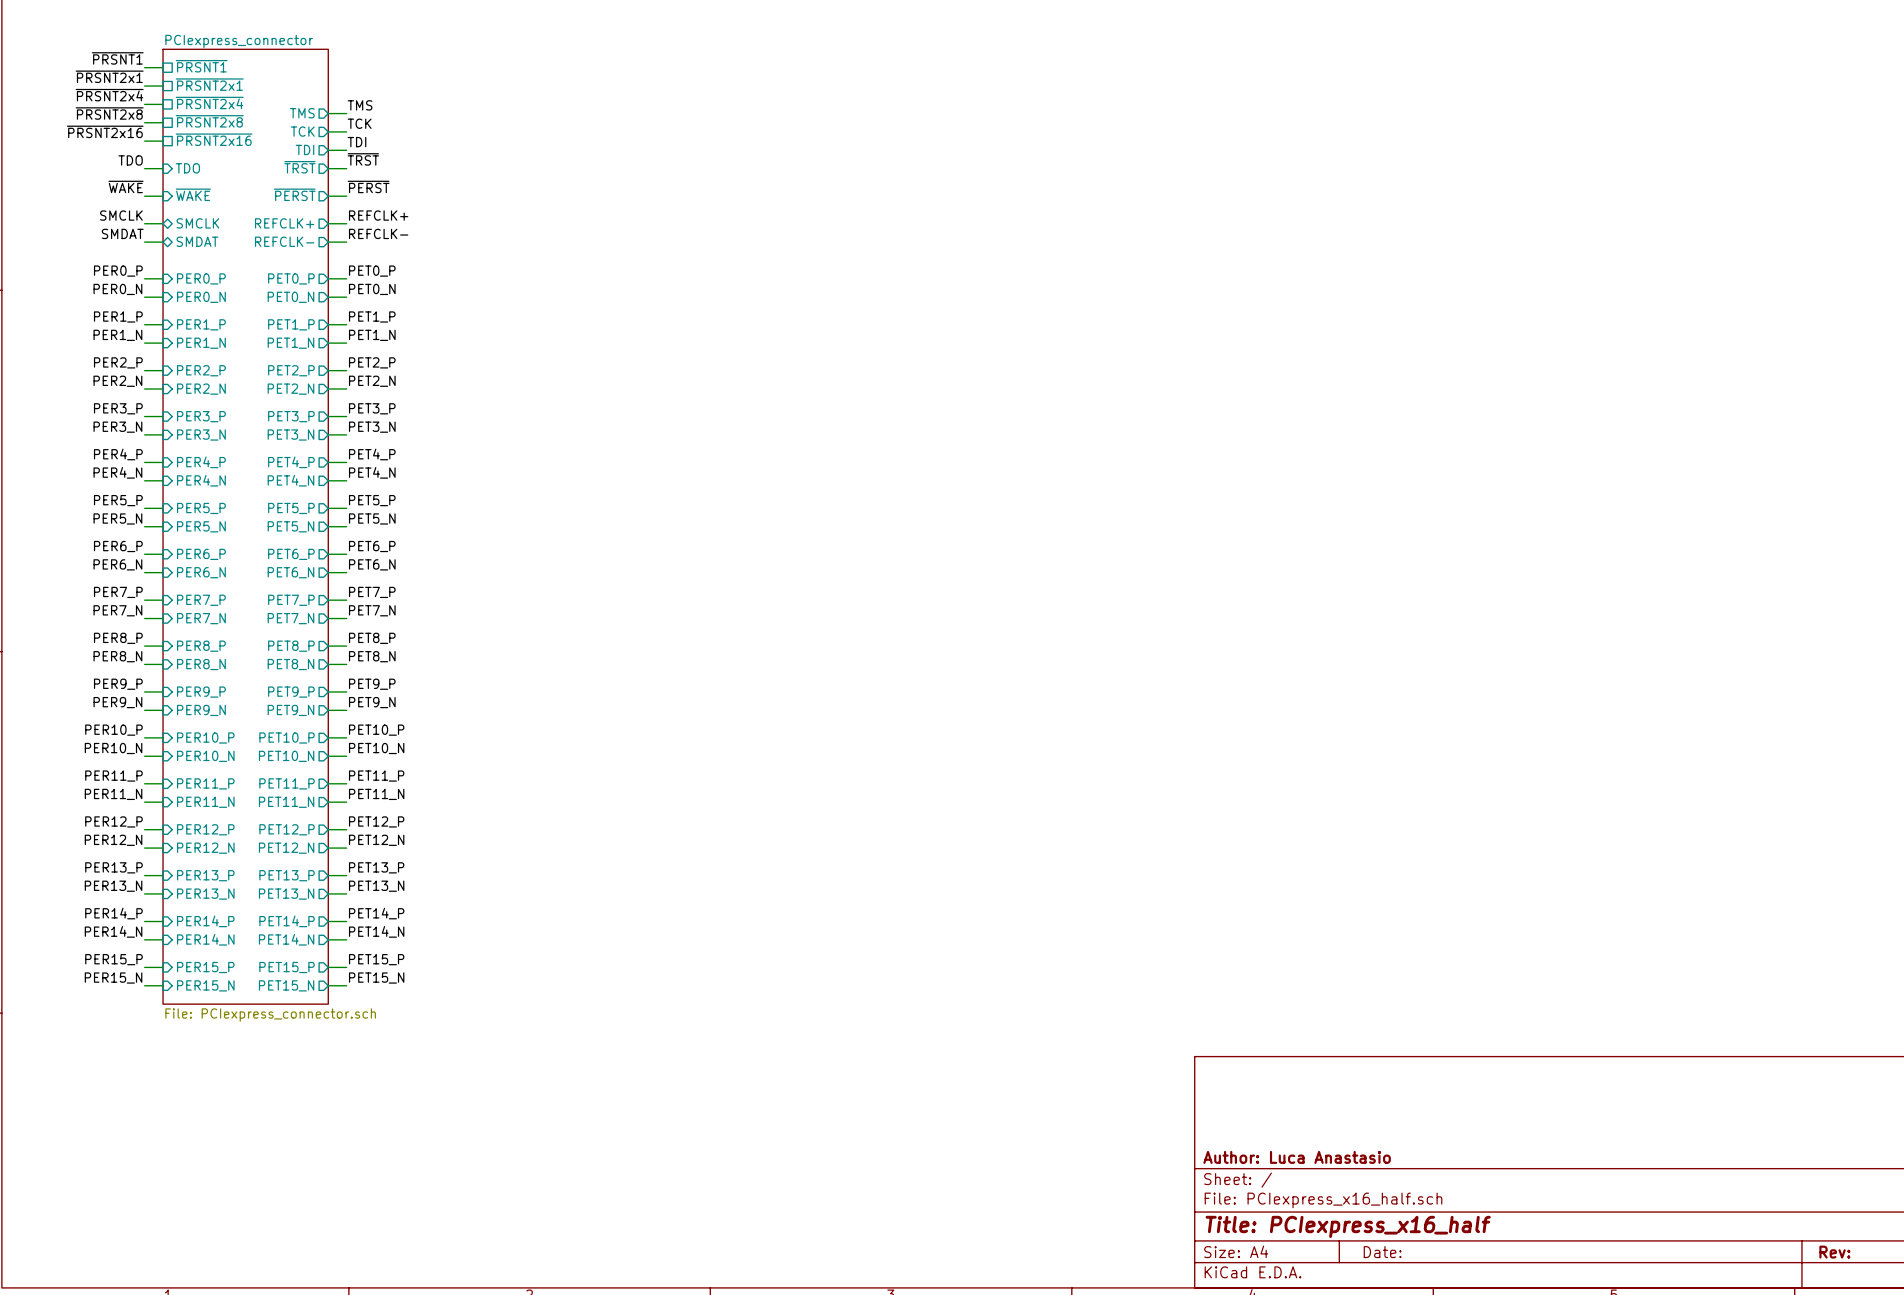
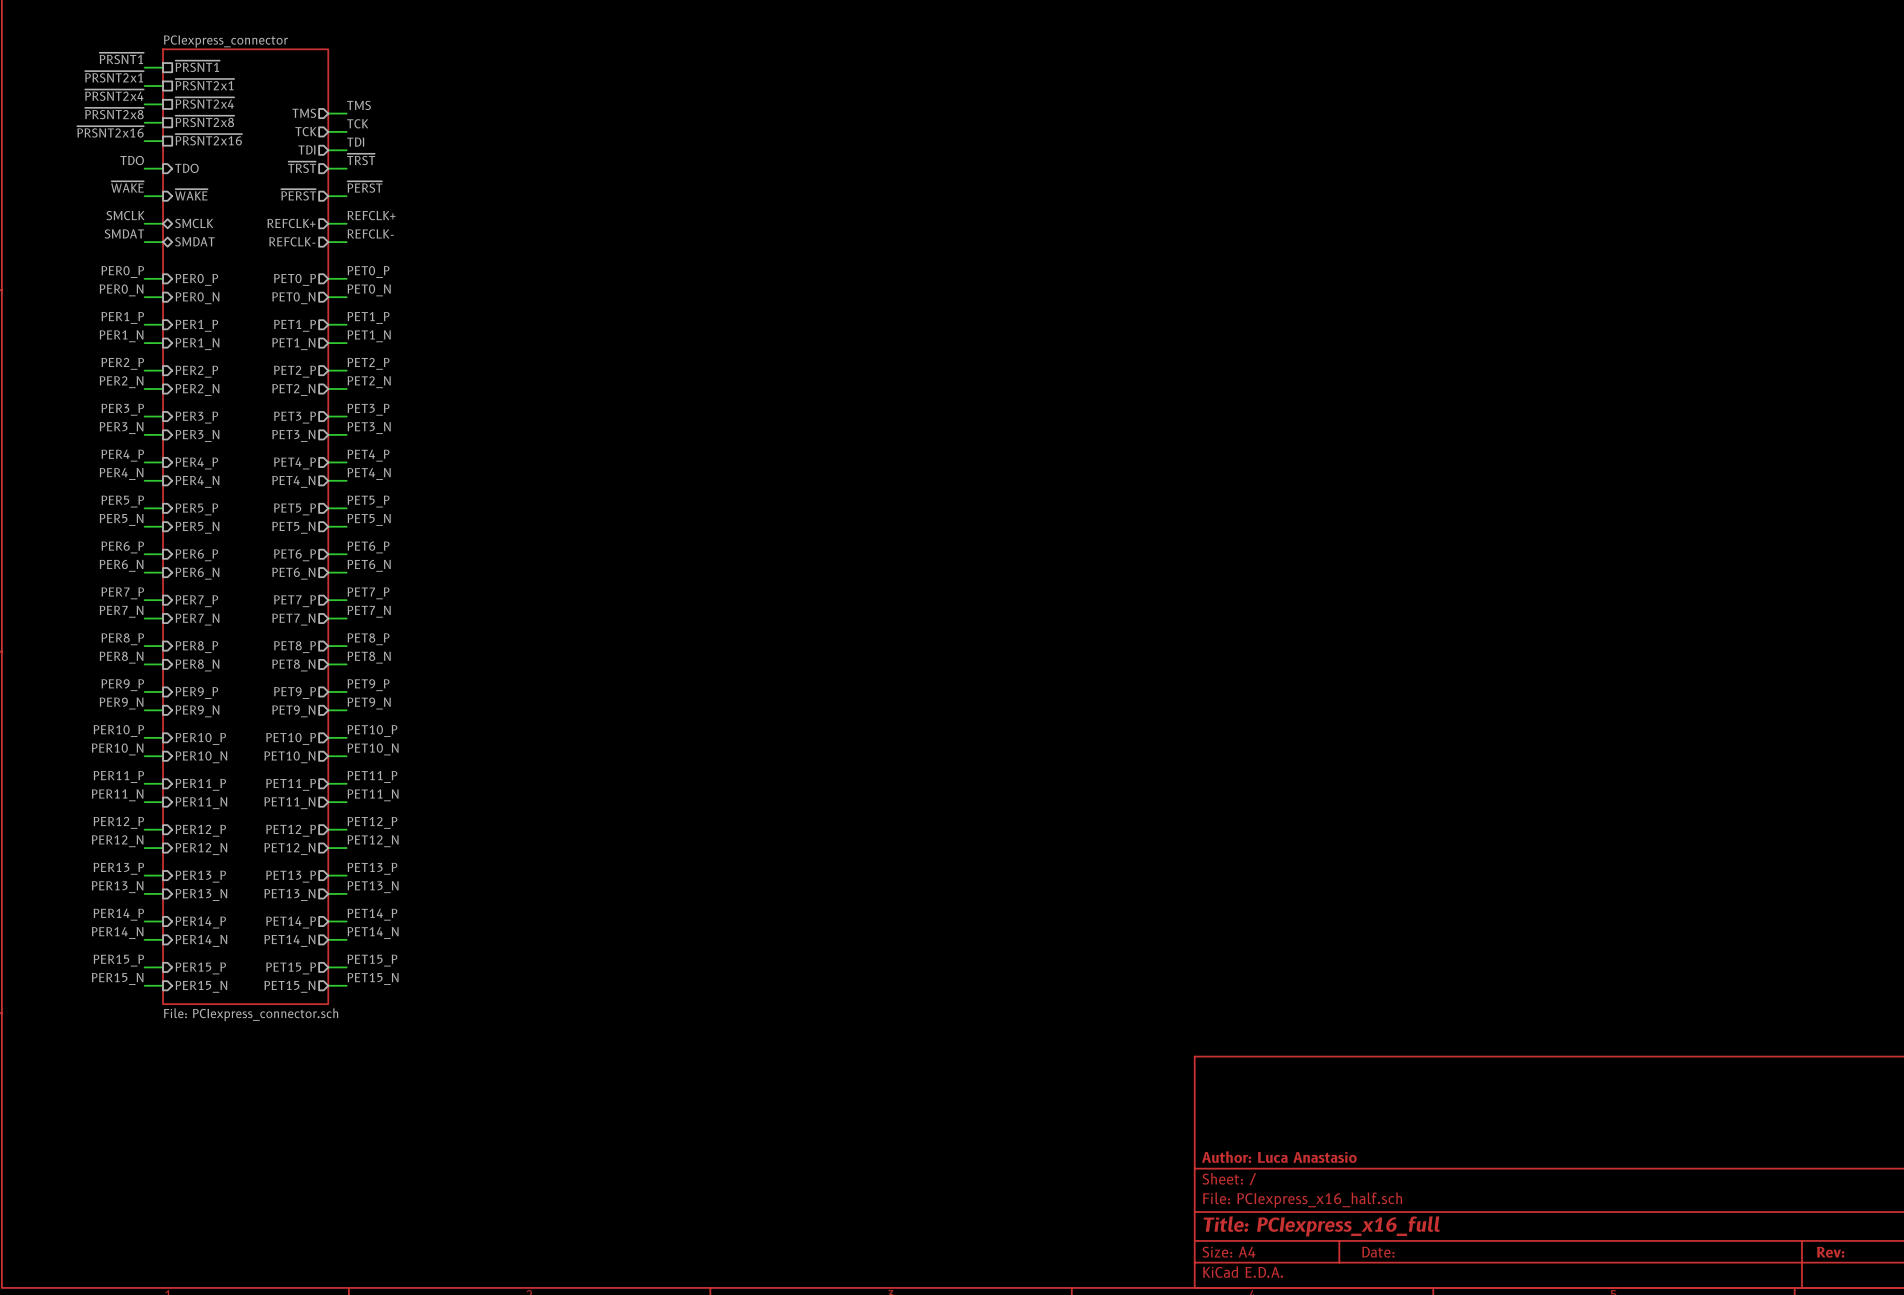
title block: Title: PCIexpress_x16_half (1348, 1226) -> Title: PCIexpress_x16_full (1321, 1226)

